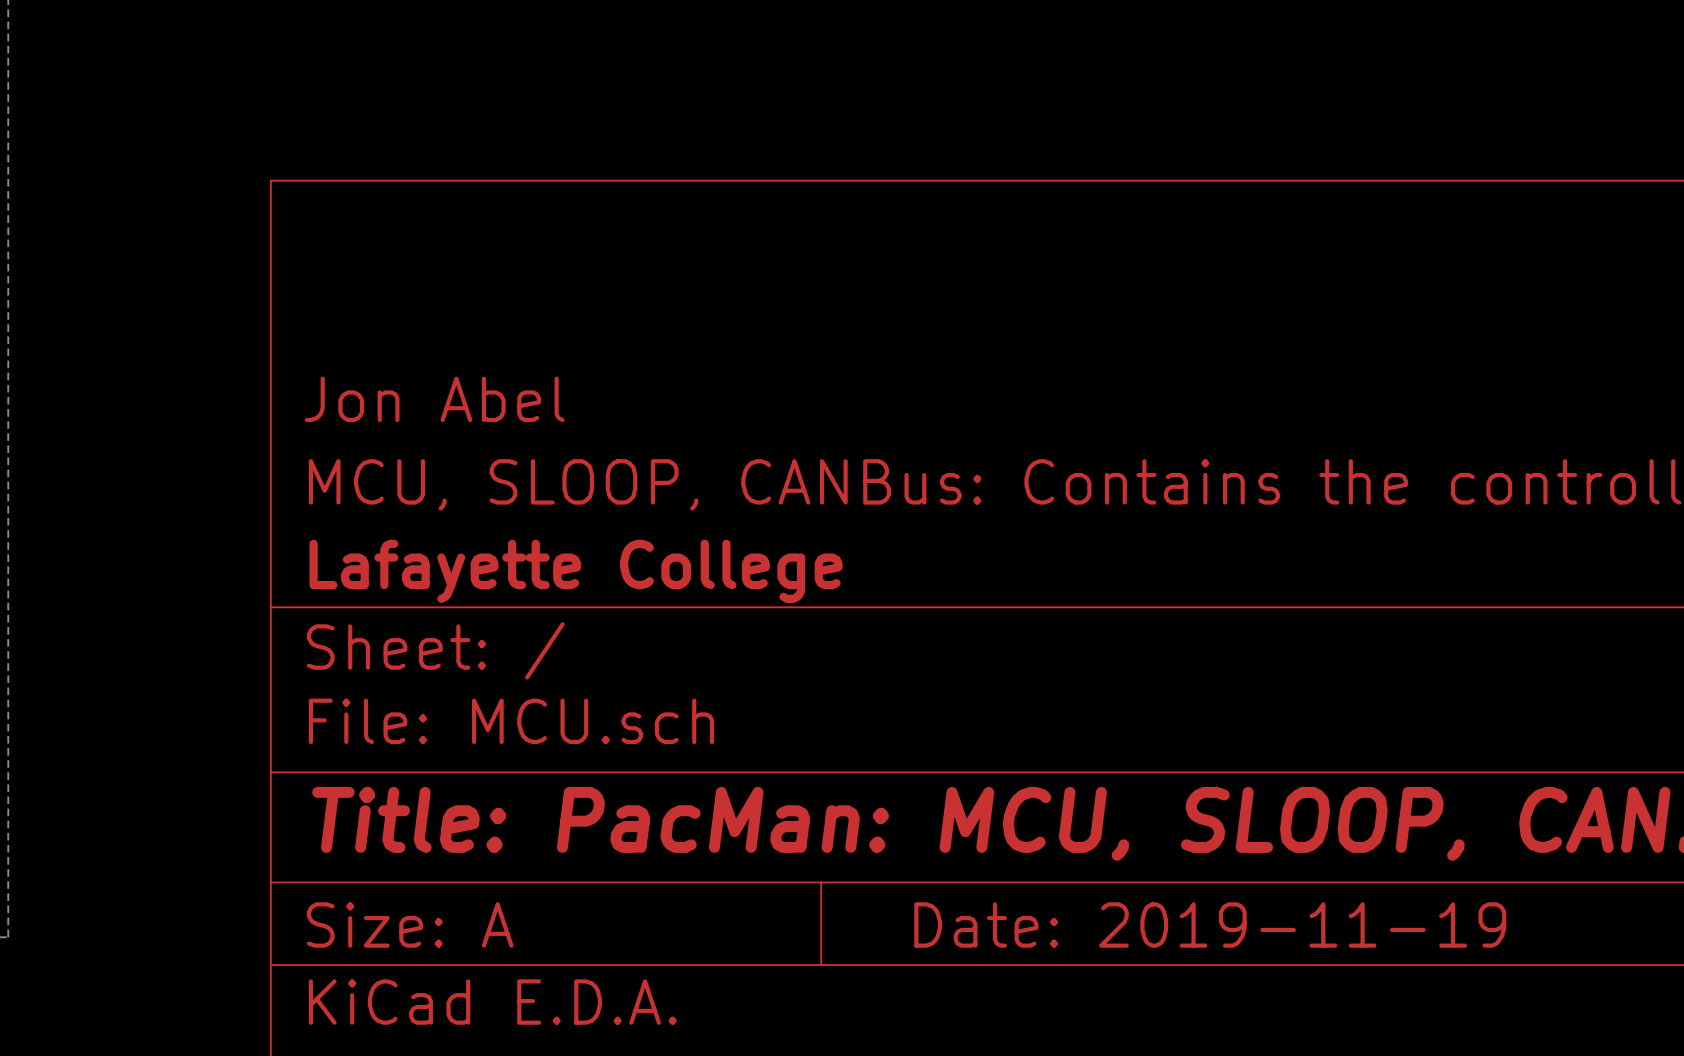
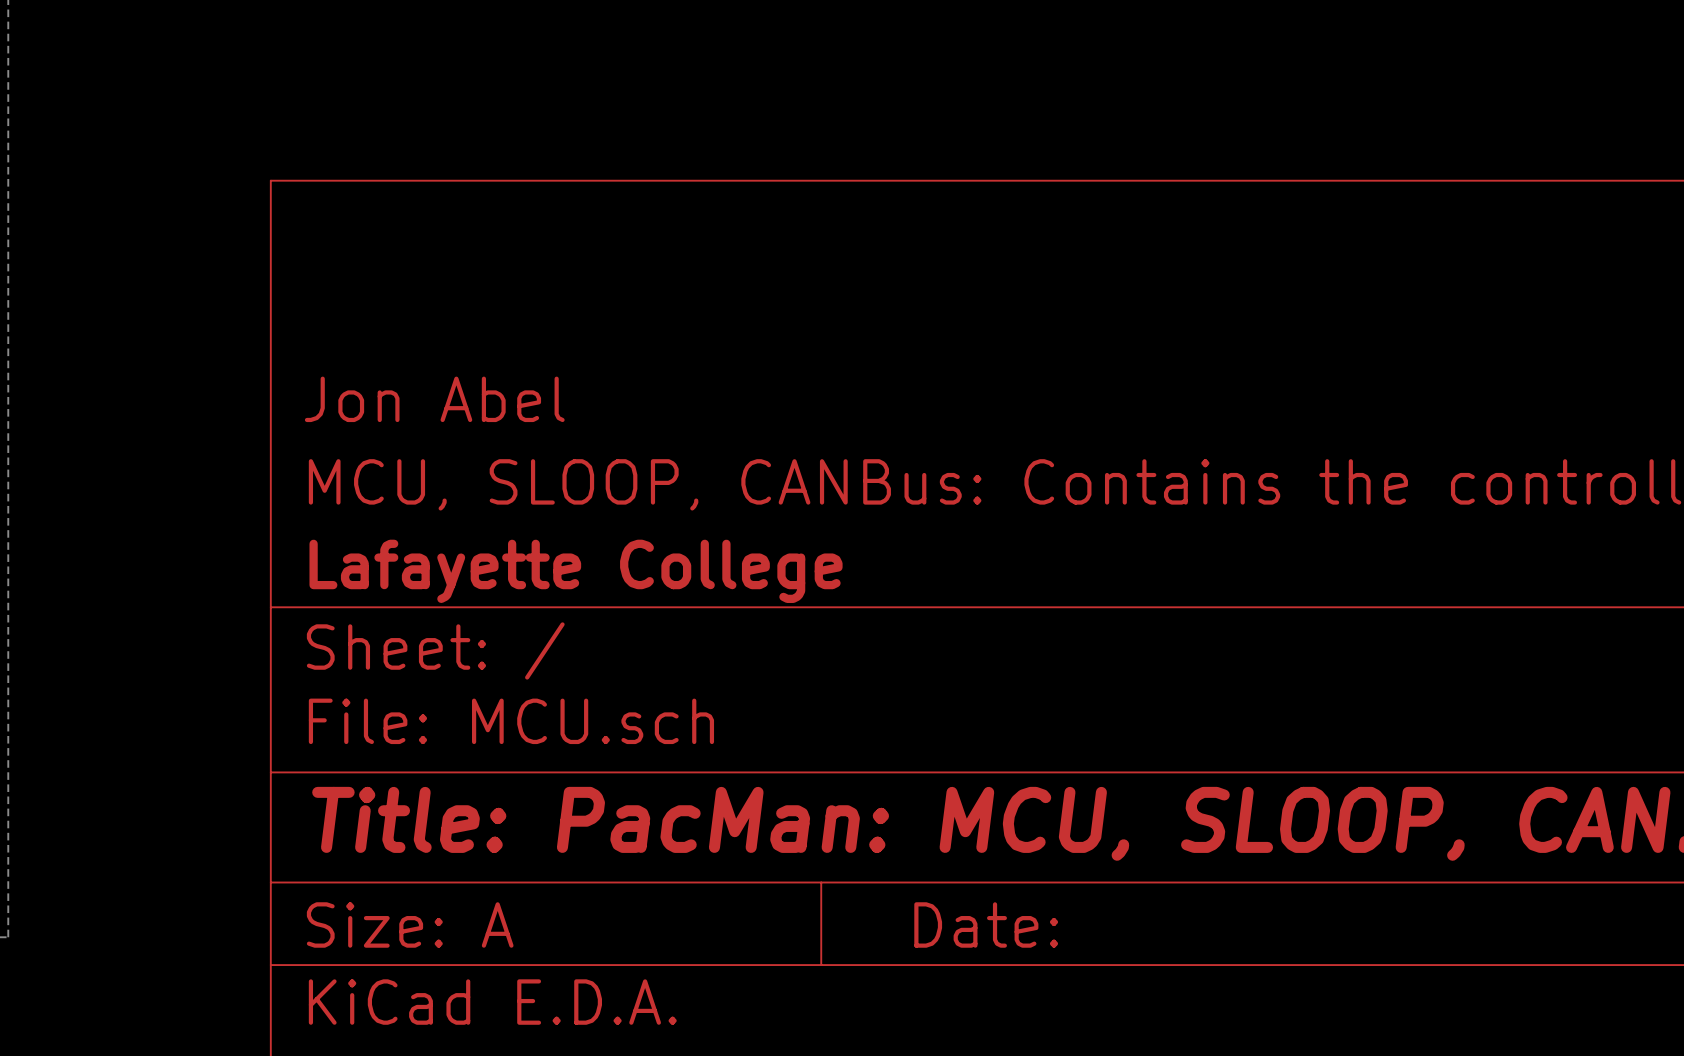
title block: Date: 2019-11-19 (1210, 924) -> Date: (986, 924)

